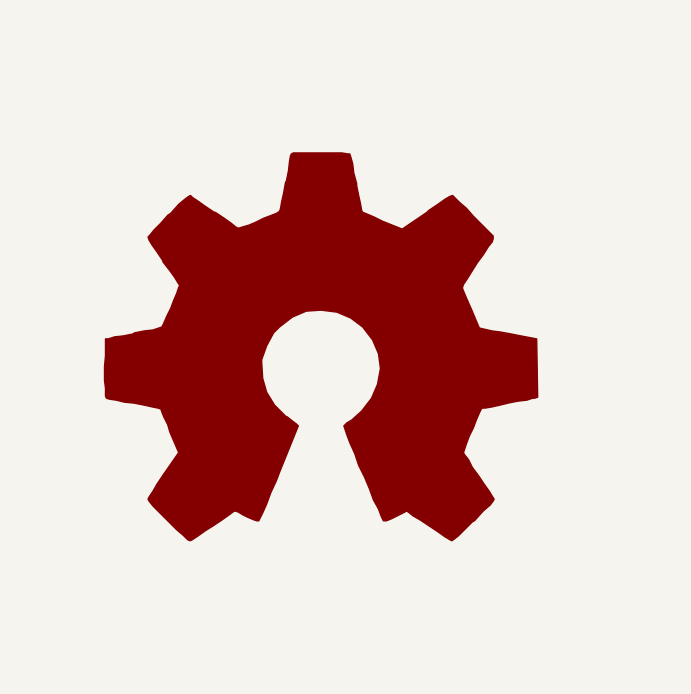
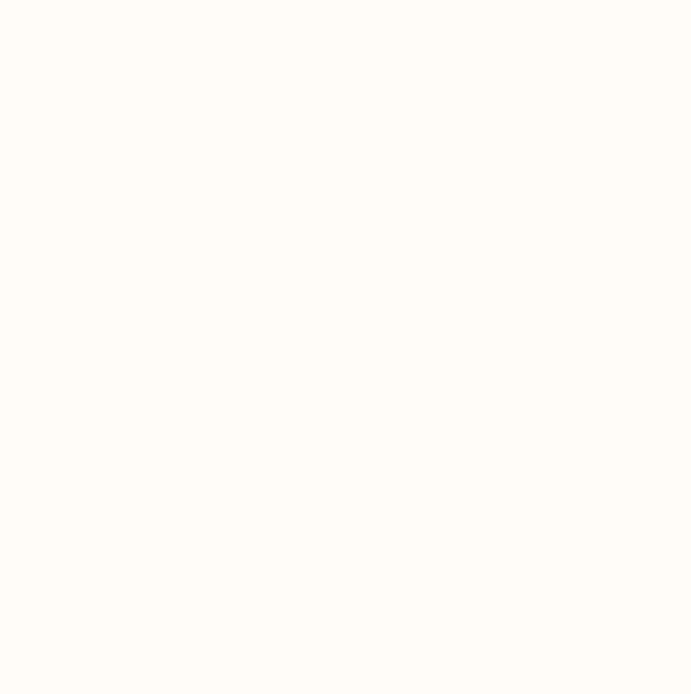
power symbol: (321, 346) -> none

